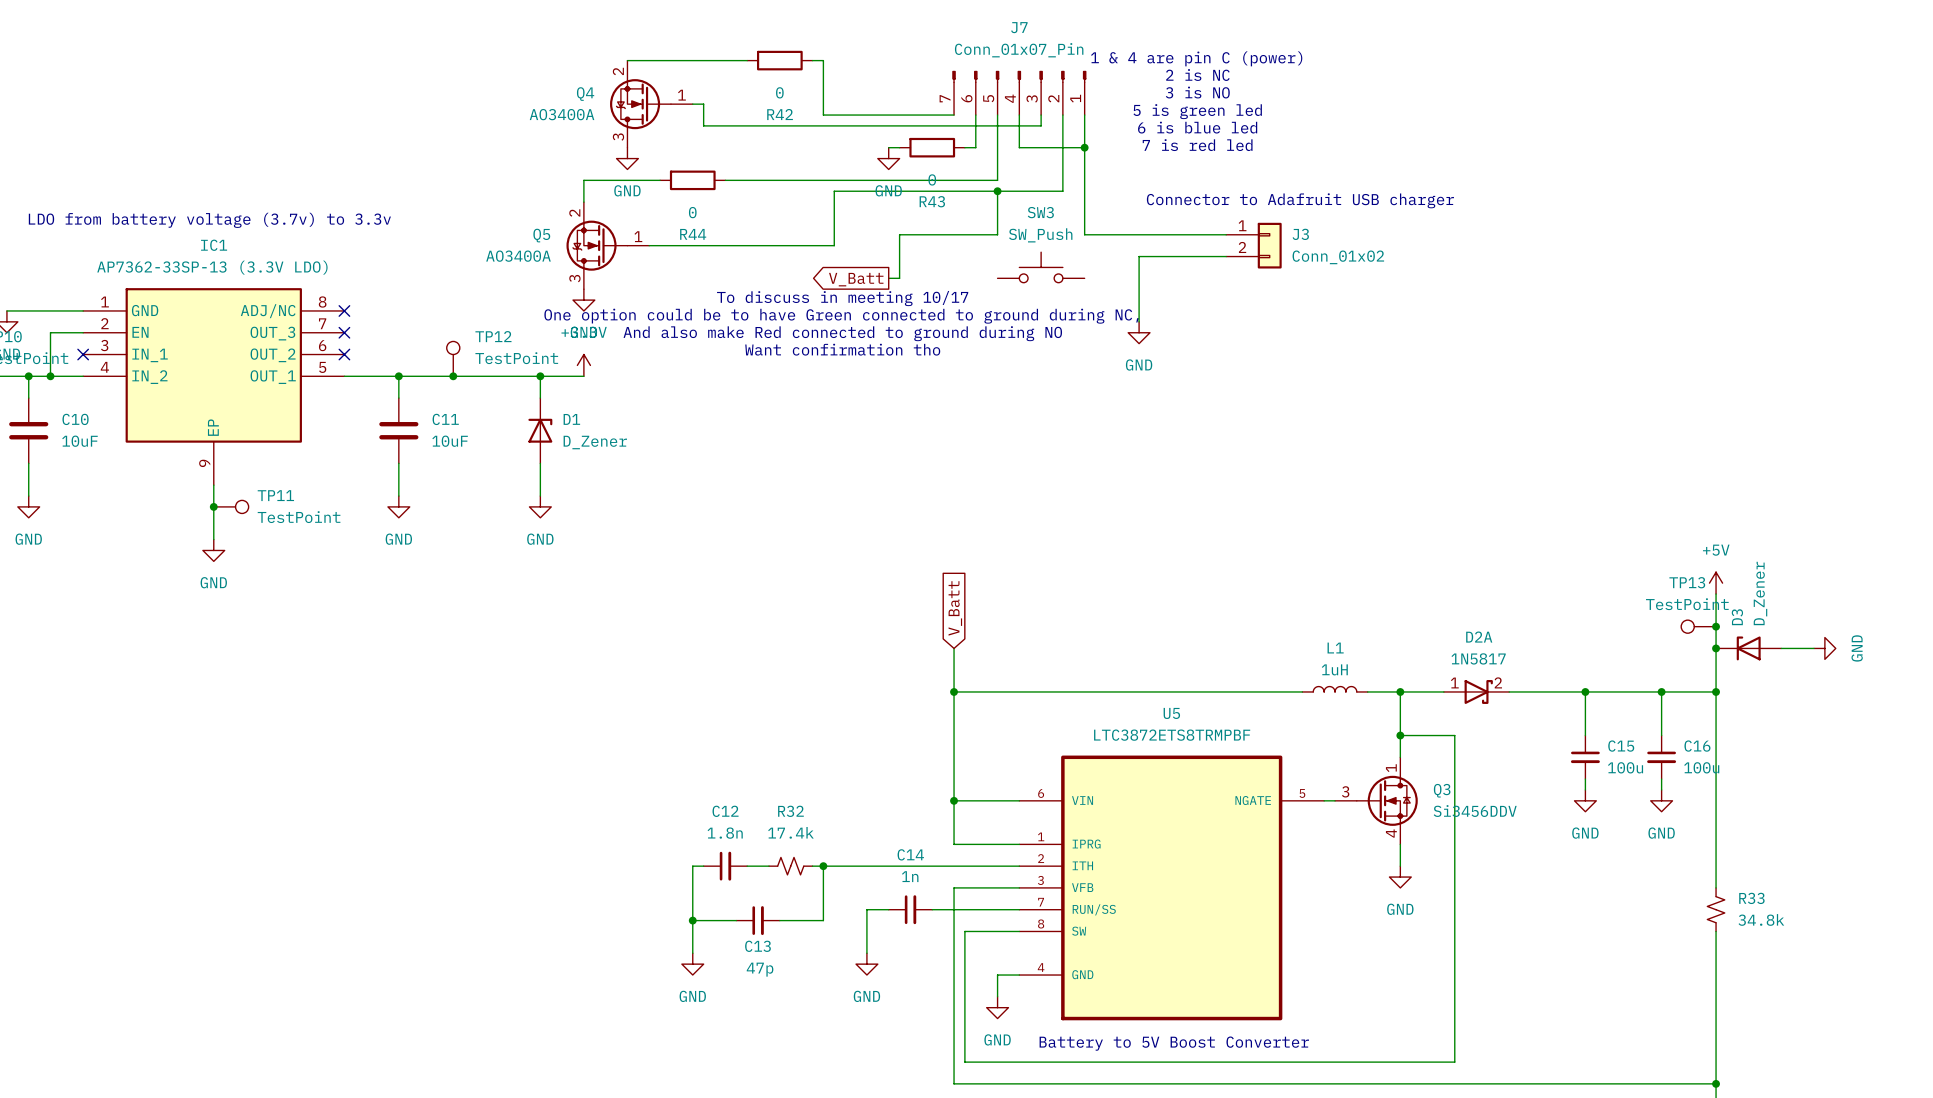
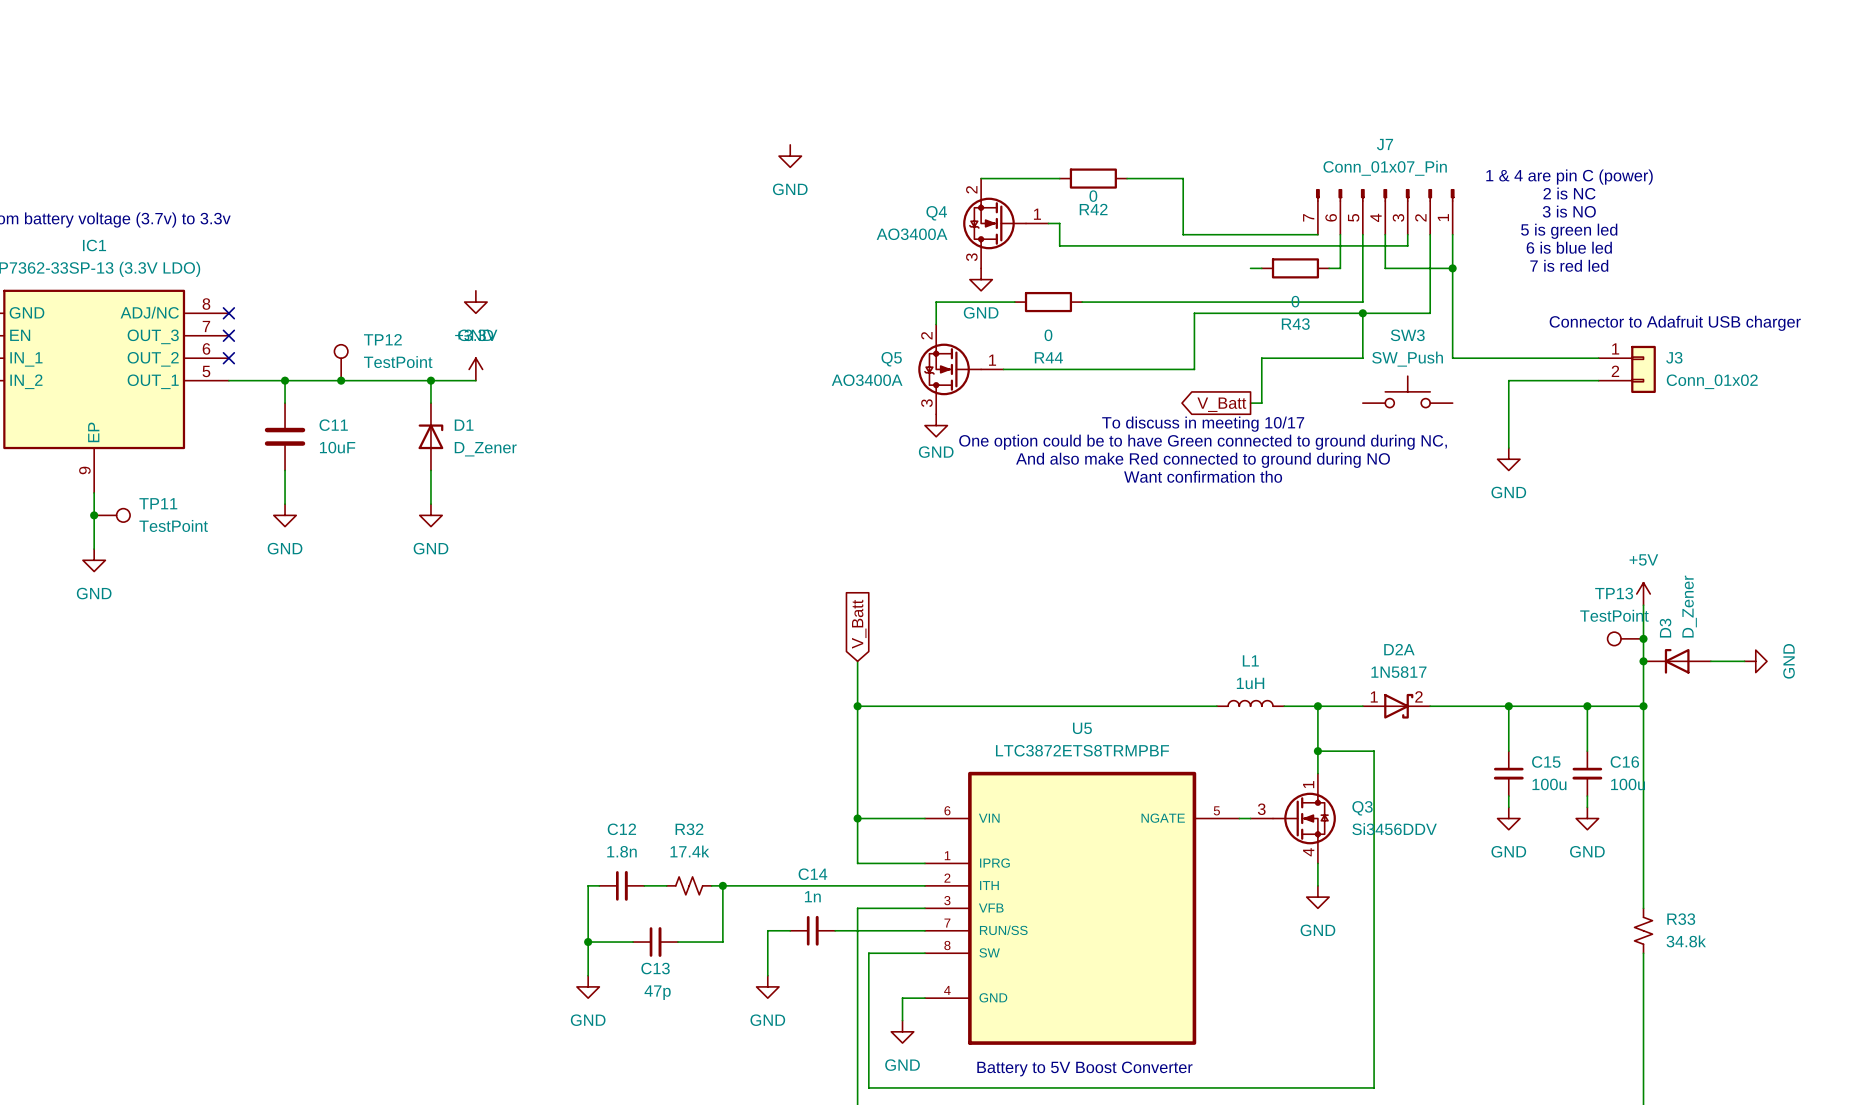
text: 1 & 4 are pin C (power) (1196, 58) -> none
wire: (627, 60) (747, 60) -> none
R42 position: (779, 60) -> (1093, 178)
wire: (812, 60) (823, 60) (823, 115) (954, 115) -> none
text: 2 is NC (1197, 75) -> none
R42 value position: 0 (779, 92) -> 0 (1093, 196)
J7 position: (1019, 92) -> (1385, 211)
text: 3 is NO (1197, 92) -> none
Q4 position: (651, 104) -> (1005, 223)
wire: (692, 104) (703, 104) (703, 125) (1041, 125) (1041, 115) -> none
text: 5 is green led (1197, 111) -> none
R42 name position: R42 (780, 114) -> R42 (1093, 209)
wire: (975, 115) (975, 147) (964, 147) -> none
wire: (997, 115) (997, 180) (725, 180) -> none
wire: (1019, 115) (1019, 147) (1084, 147) -> none
wire: (1062, 115) (1062, 191) (834, 191) (834, 245) (649, 245) -> none
wire: (1084, 115) (1084, 234) (1226, 234) -> none
text: 6 is blue led (1197, 127) -> none
text: 7 is red led (1197, 145) -> none
wire: (888, 147) (899, 147) -> none
R43 position: (932, 147) -> (1295, 268)
junction: (1084, 147) -> none
power symbol: GND (627, 158) -> none
text: none -> 1 & 4 are pin C (power) (1569, 177)
wire: (660, 180) (583, 180) (583, 202) -> none
R44 position: (692, 180) -> (1048, 302)
wire: none -> (981, 178) (1059, 178)
wire: none -> (1127, 178) (1183, 178) (1183, 234) (1317, 234)
wire: (997, 191) (997, 234) (899, 234) (899, 278) (888, 278) -> none
junction: (997, 191) -> none
text: none -> 2 is NC (1569, 193)
text: Connector to Adafruit USB charger (1300, 200) -> none
text: none -> 3 is NO (1569, 211)
wire: none -> (1048, 223) (1059, 223) (1059, 245) (1407, 245) (1407, 234)
text: none -> 5 is green led (1569, 231)
wire: none -> (1340, 234) (1340, 268) (1329, 268)
wire: none -> (1362, 234) (1362, 302) (1082, 302)
wire: none -> (1385, 234) (1385, 268) (1452, 268)
wire: none -> (1430, 234) (1430, 313) (1194, 313) (1194, 369) (1003, 369)
wire: none -> (1452, 234) (1452, 358) (1598, 358)
Q5 position: (607, 245) -> (960, 369)
J3 position: (1253, 245) -> (1627, 369)
text: none -> 6 is blue led (1569, 247)
wire: (1226, 256) (1139, 256) (1139, 321) -> none
text: none -> 7 is red led (1569, 265)
SW3 position: (1041, 267) -> (1407, 391)
wire: none -> (1250, 268) (1261, 268)
junction: none -> (1452, 268)
power symbol: none -> GND (981, 279)
global label: V_Batt (856, 279) -> none
text: To discuss in meeting 10/17 (842, 298) -> none
wire: none -> (1014, 302) (936, 302) (936, 324)
wire: none -> (1362, 313) (1362, 358) (1261, 358) (1261, 403) (1250, 403)
junction: none -> (1362, 313)
text: One option could be to have Green connected to ground during NC, (841, 316) -> none
text: none -> Connector to Adafruit USB charger (1675, 323)
power symbol: GND (1139, 332) -> none
text: And also make Red connected to ground during NO (842, 333) -> none
text: Want confirmation tho (842, 349) -> none
wire: none -> (1598, 380) (1508, 380) (1508, 448)
global label: none -> V_Batt (1221, 404)
text: none -> To discuss in meeting 10/17 (1203, 424)
power symbol: none -> GND (936, 425)
text: none -> One option could be to have Green connected to ground during NC, (1203, 442)
power symbol: none -> GND (1508, 459)
text: none -> And also make Red connected to ground during NO (1203, 460)
text: none -> Want confirmation tho (1203, 476)

